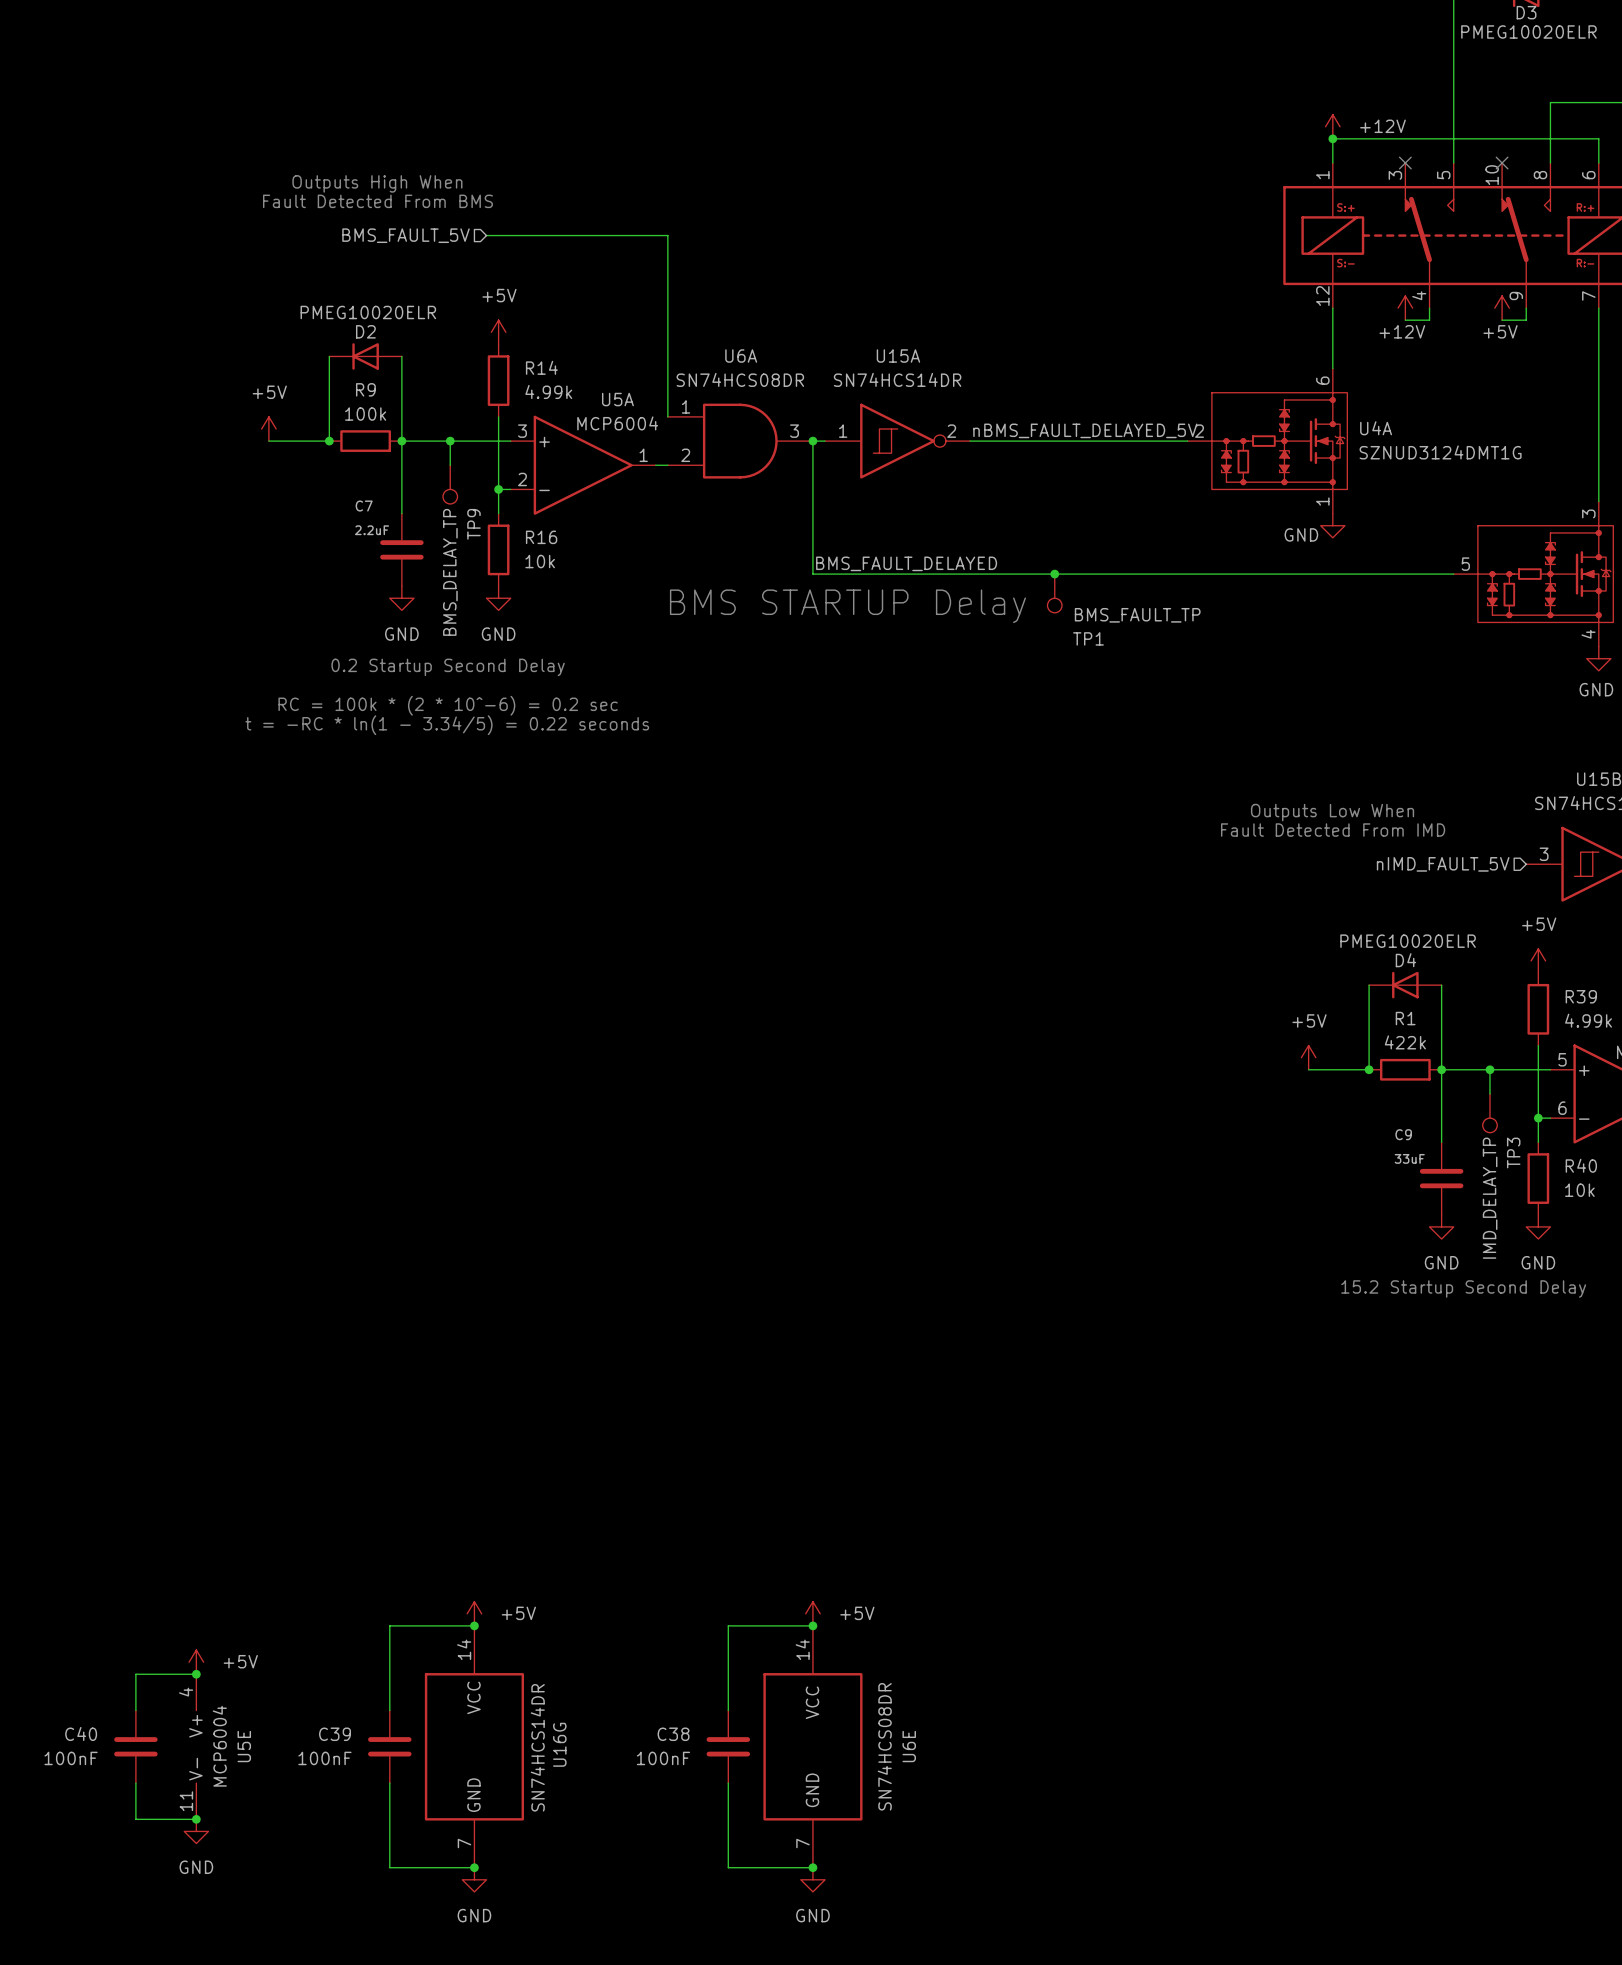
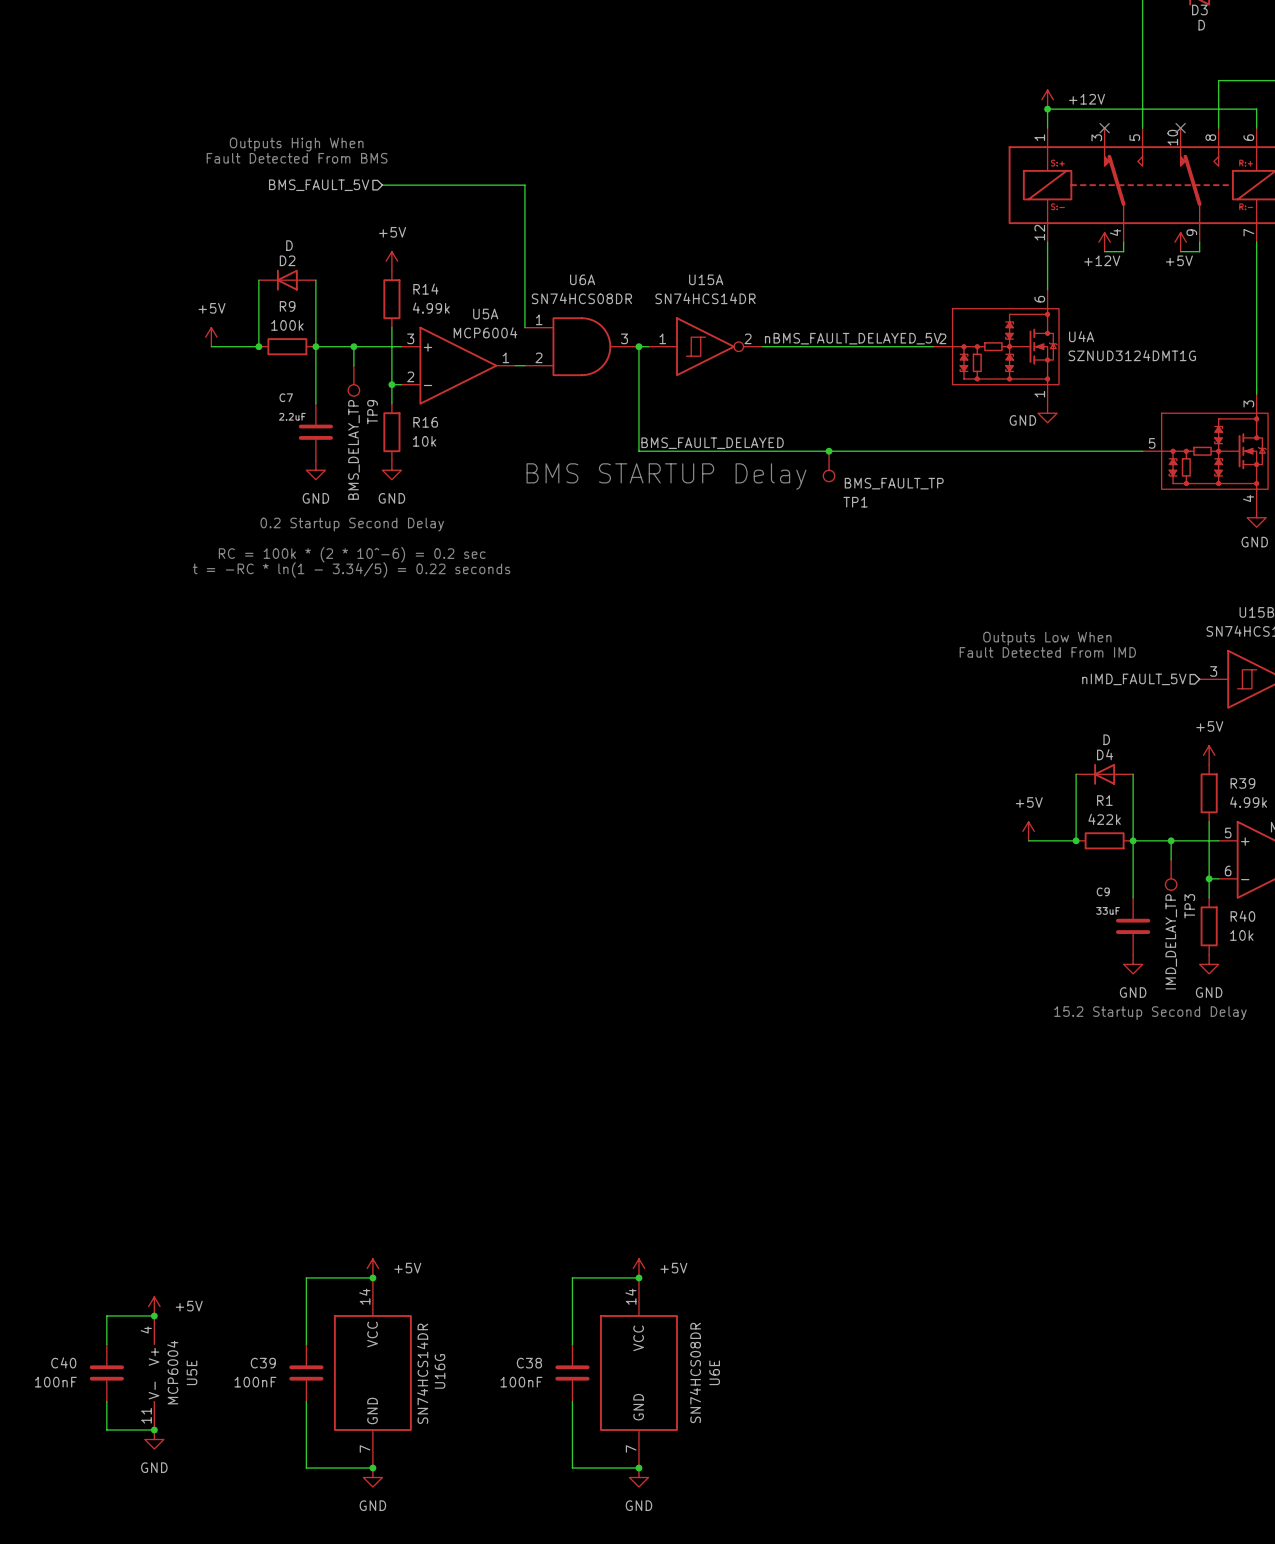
D3 value: PMEG10020ELR (1528, 32) -> D (1201, 25)
D2 value: PMEG10020ELR (368, 312) -> D (289, 245)
D4 value: PMEG10020ELR (1408, 941) -> D (1106, 739)

